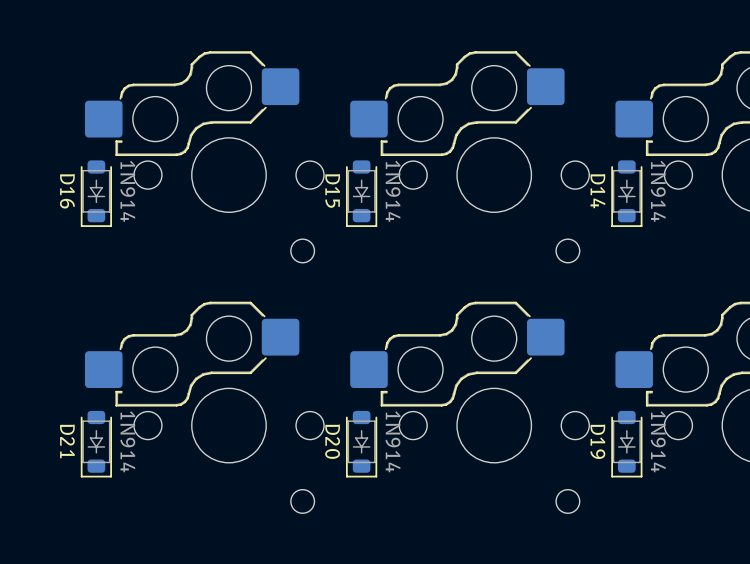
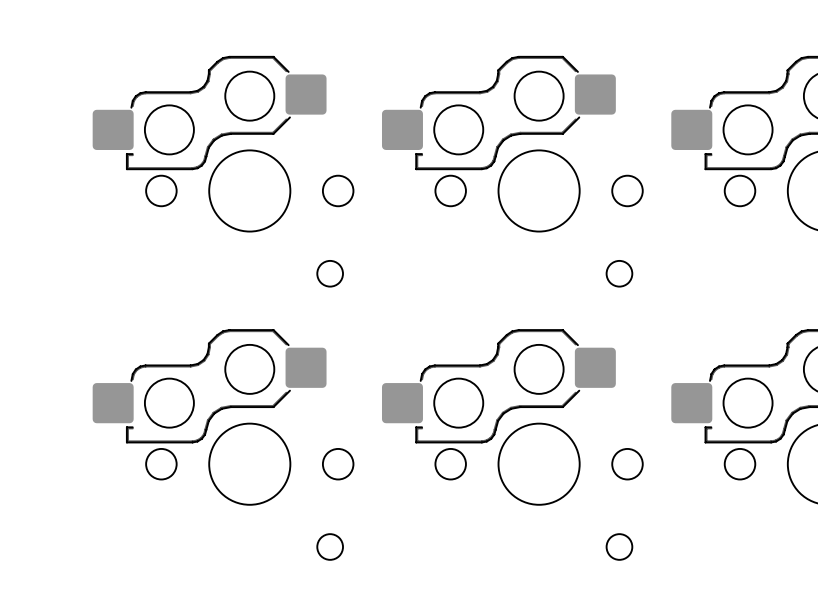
D16: 1N914 (96, 193) -> none
D15: 1N914 (361, 193) -> none
D14: 1N914 (626, 193) -> none
D21: 1N914 (96, 444) -> none
D20: 1N914 (361, 444) -> none
D19: 1N914 (626, 444) -> none

